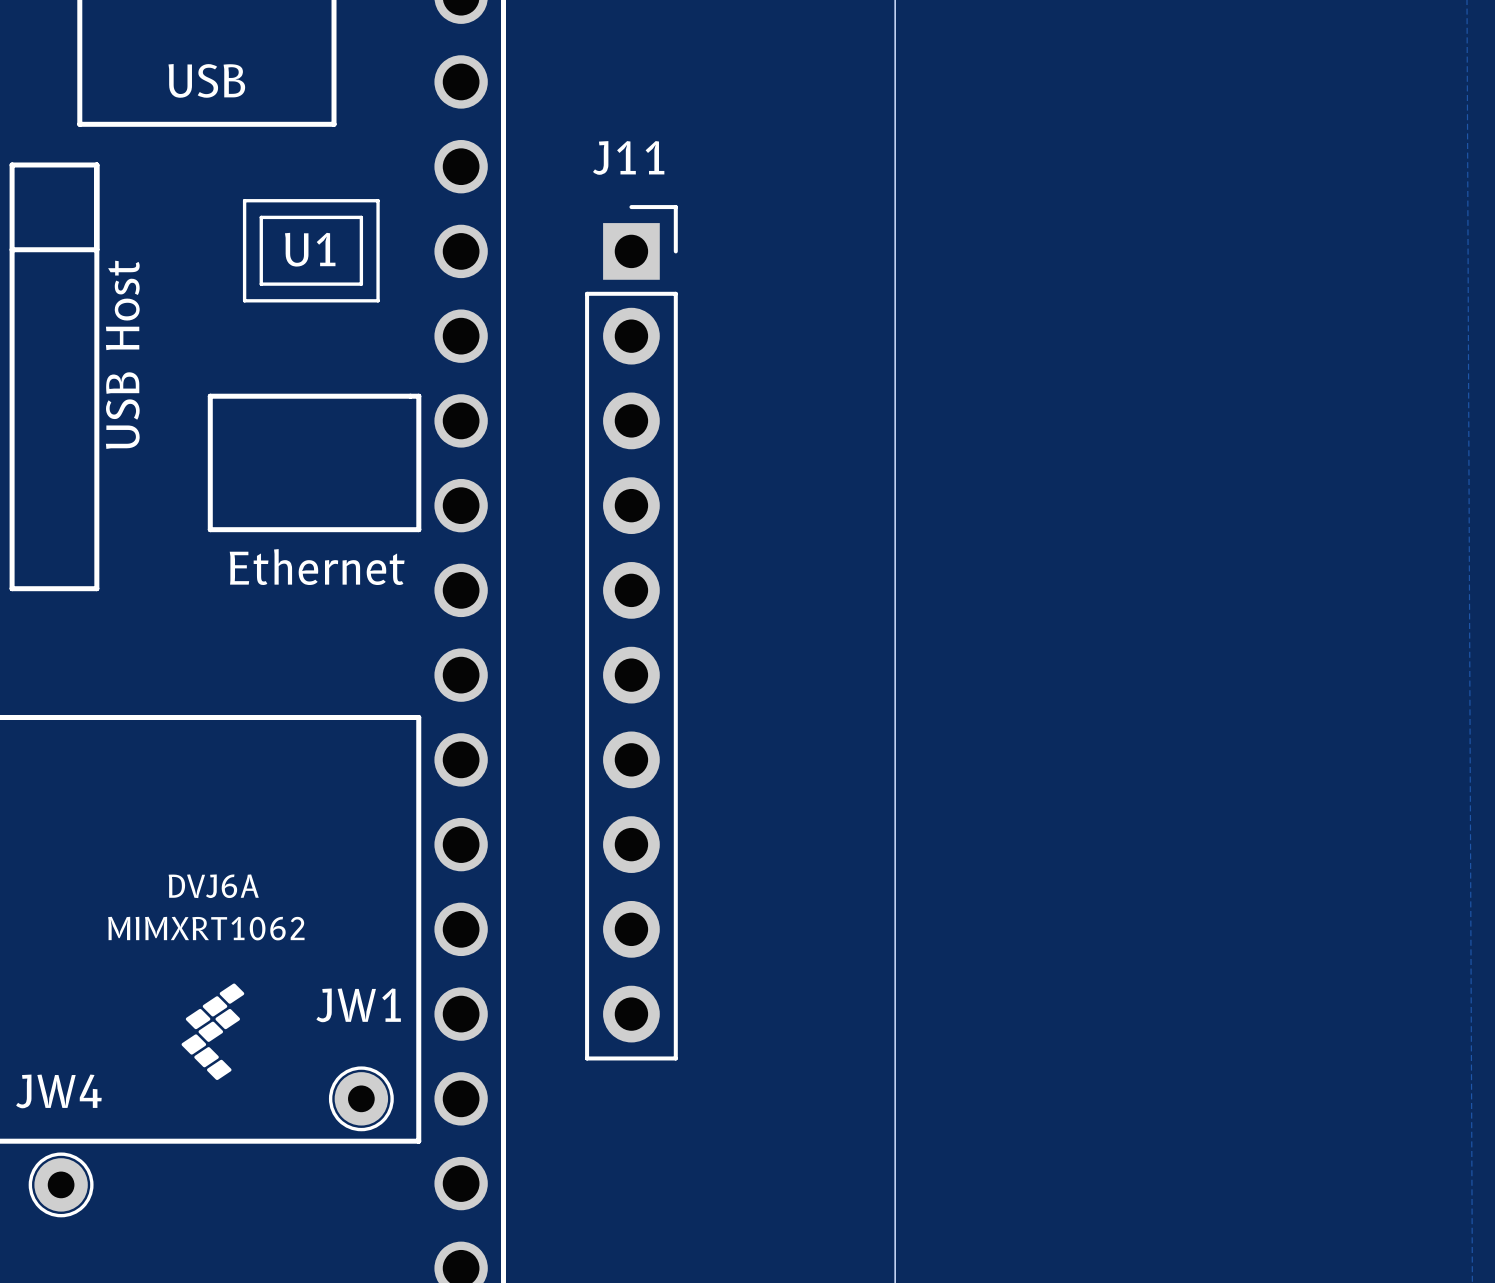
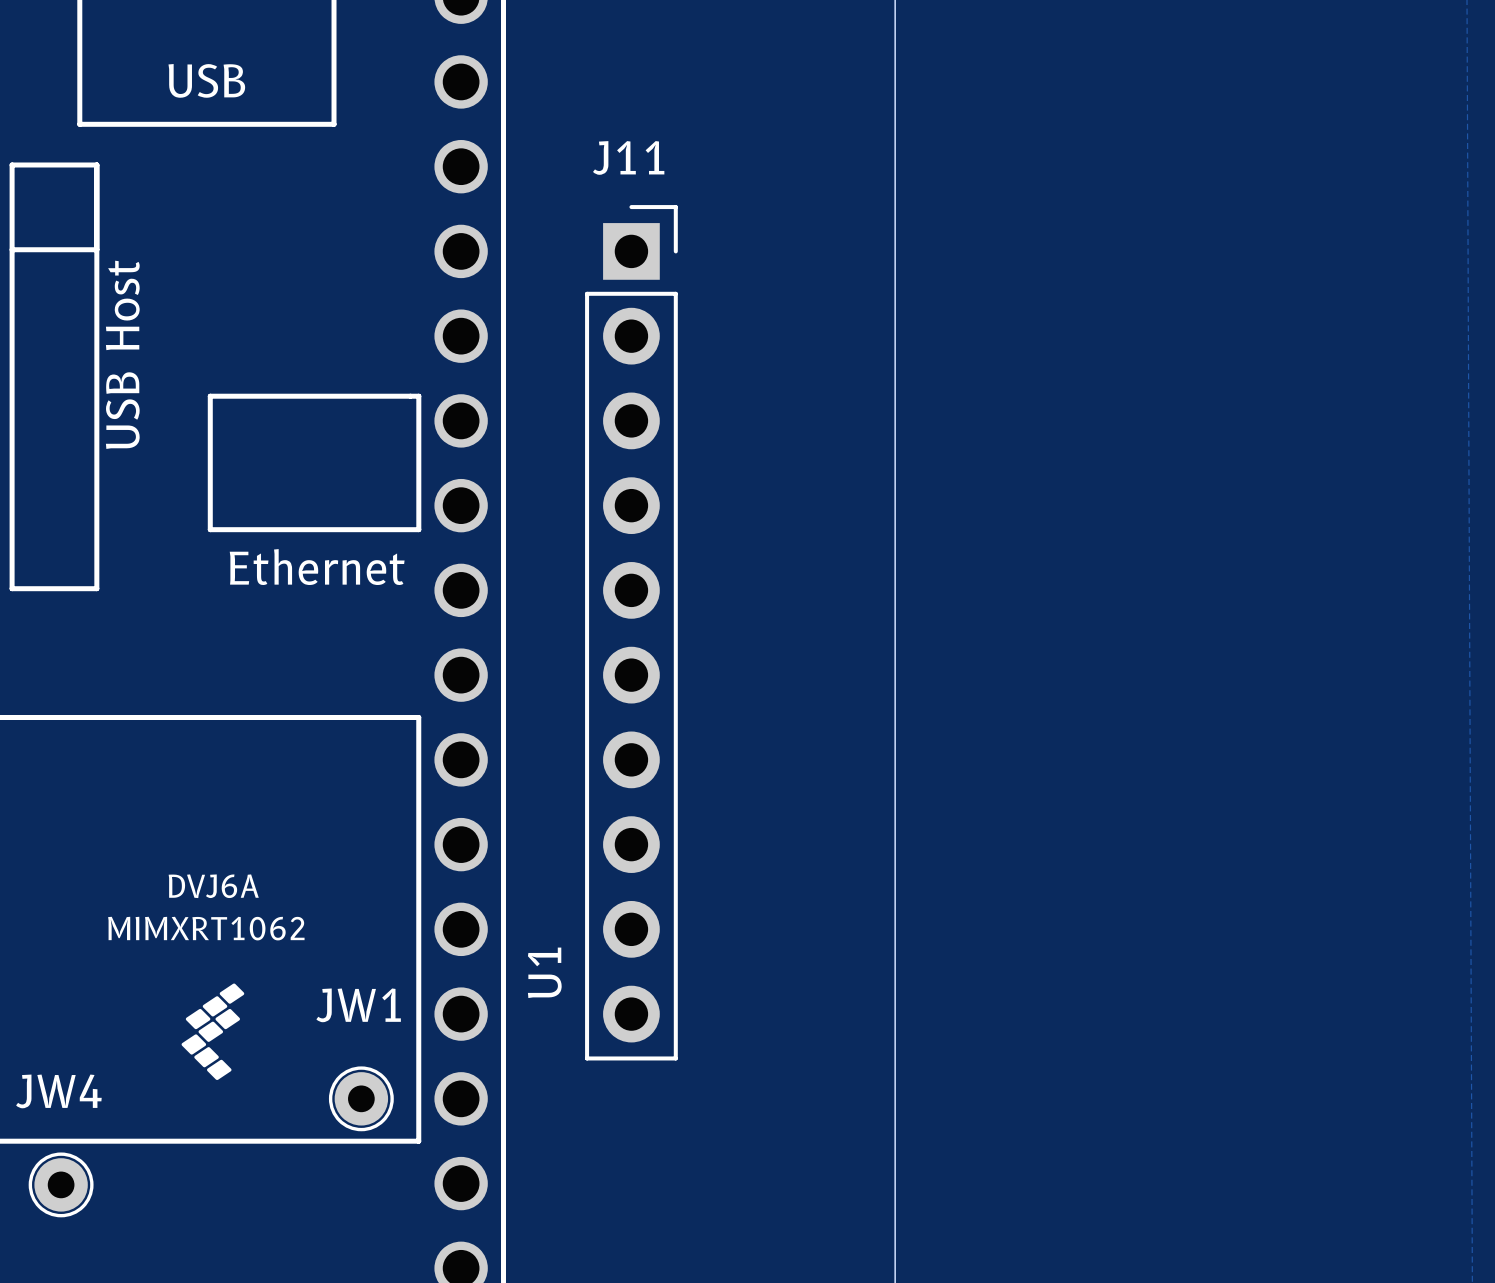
line: (244, 200) (378, 200) (378, 300) (244, 300) (244, 200) -> none
line: (261, 217) (361, 217) (361, 284) (261, 284) (261, 217) -> none
U1 name rotation: 0° (310, 249) -> 90° counterclockwise (544, 972)
U1 name position: U1 (310, 249) -> U1 (544, 972)

